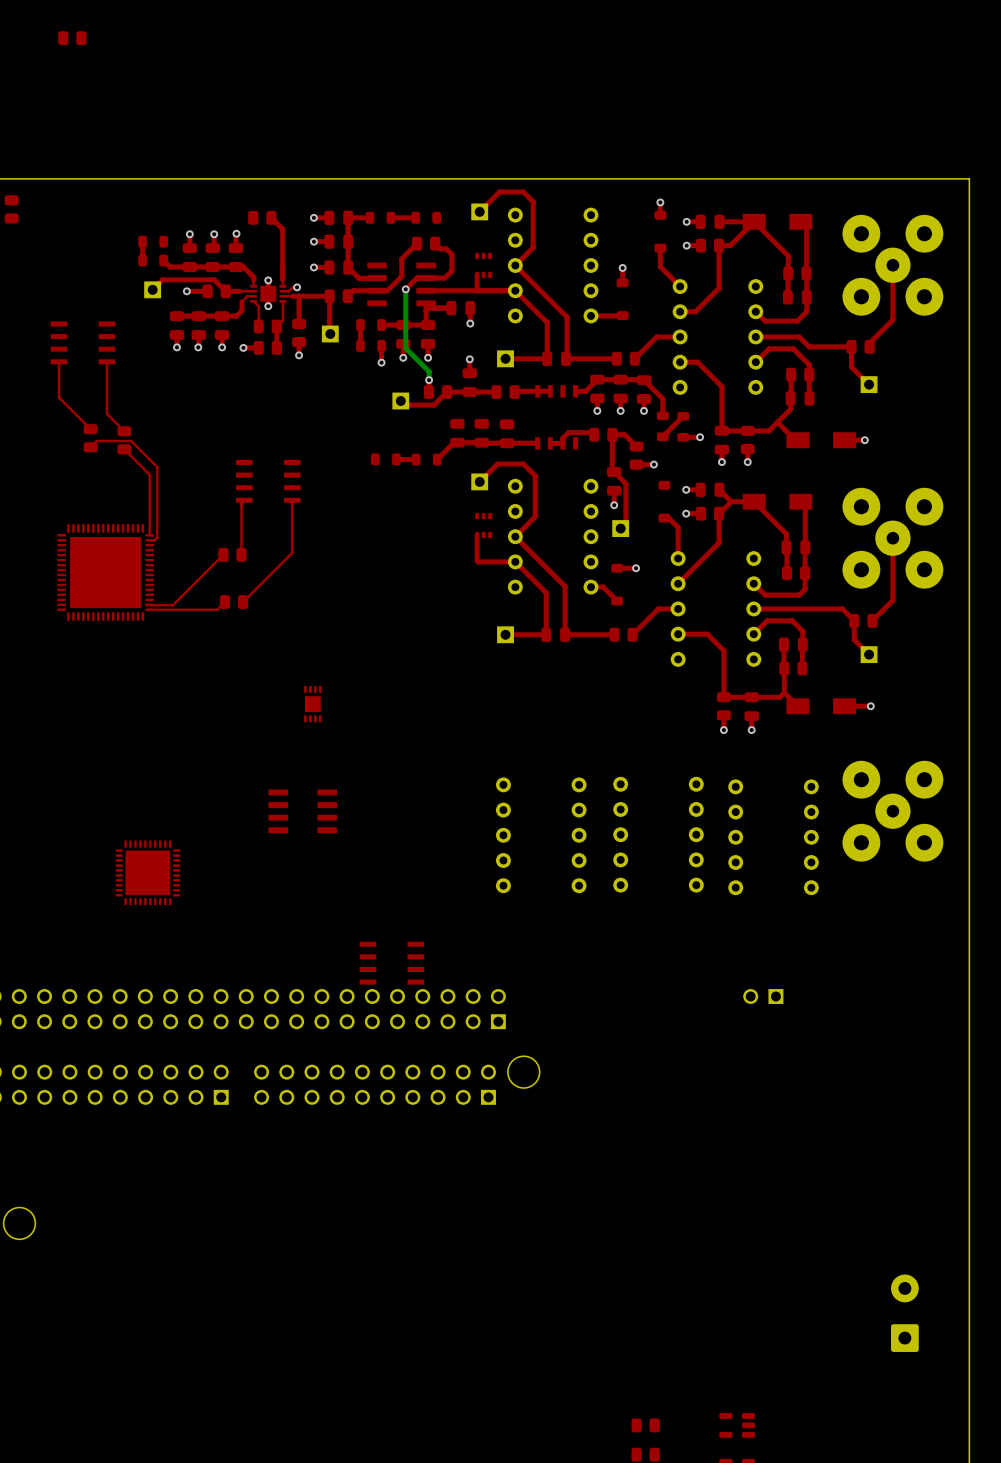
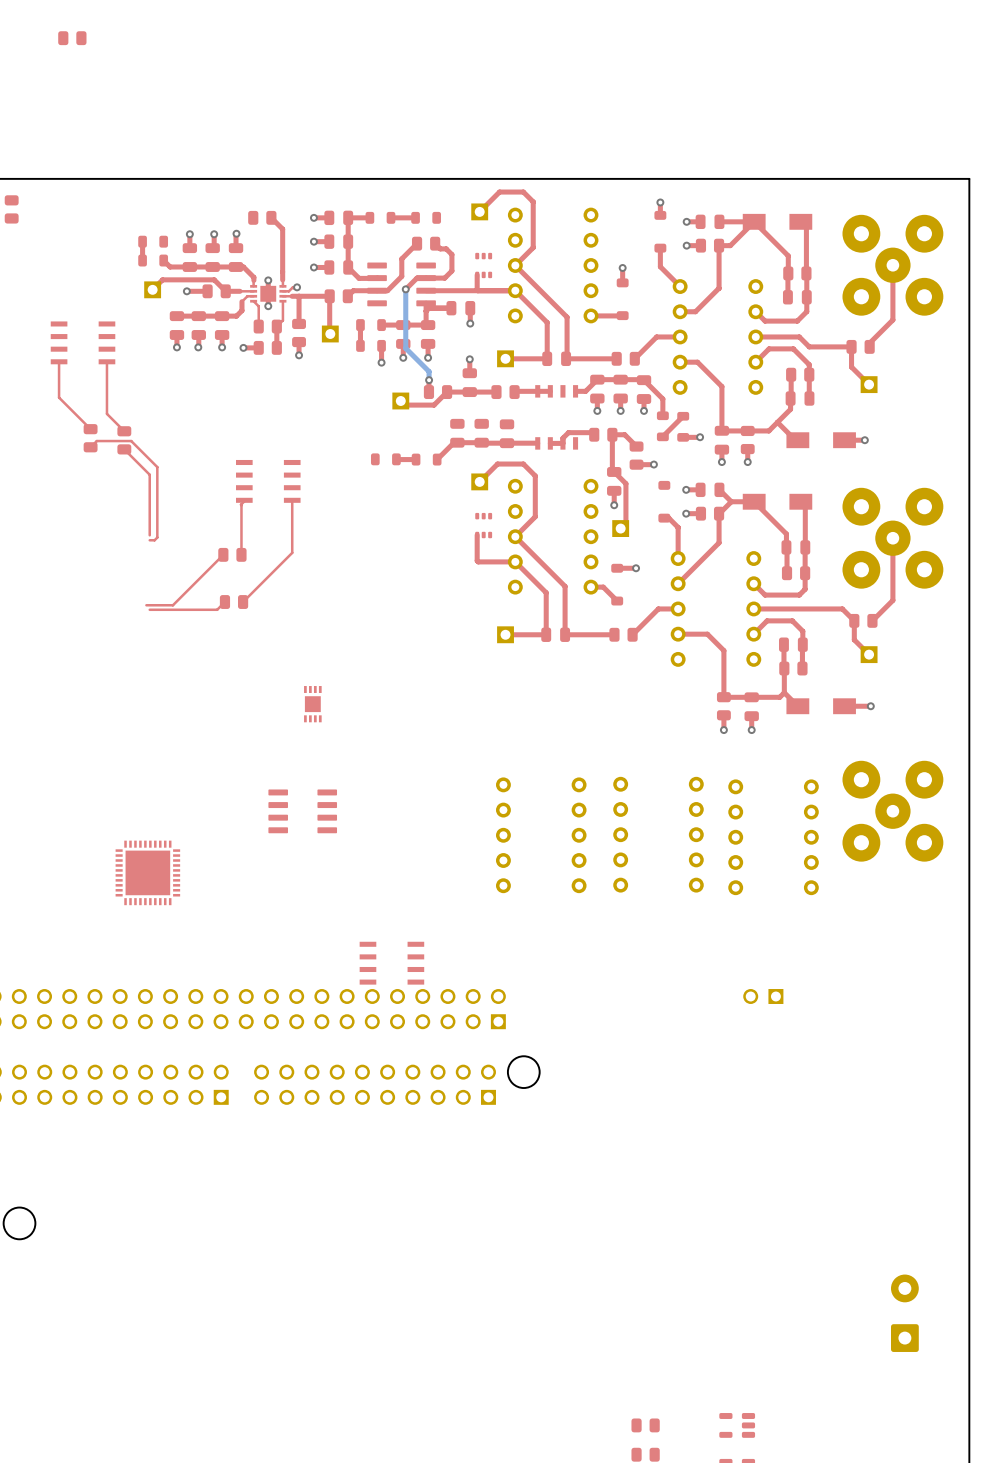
part: (105, 572) -> none

